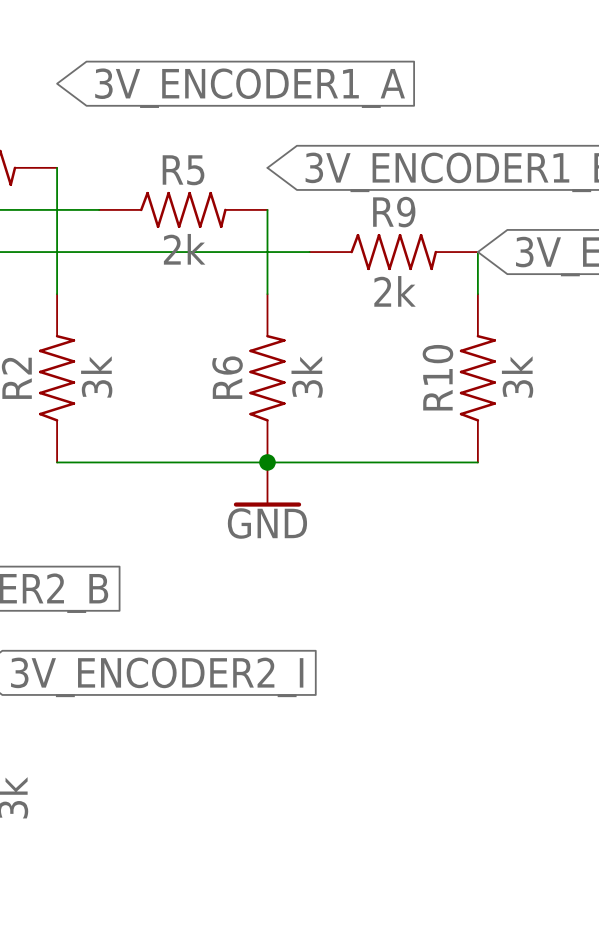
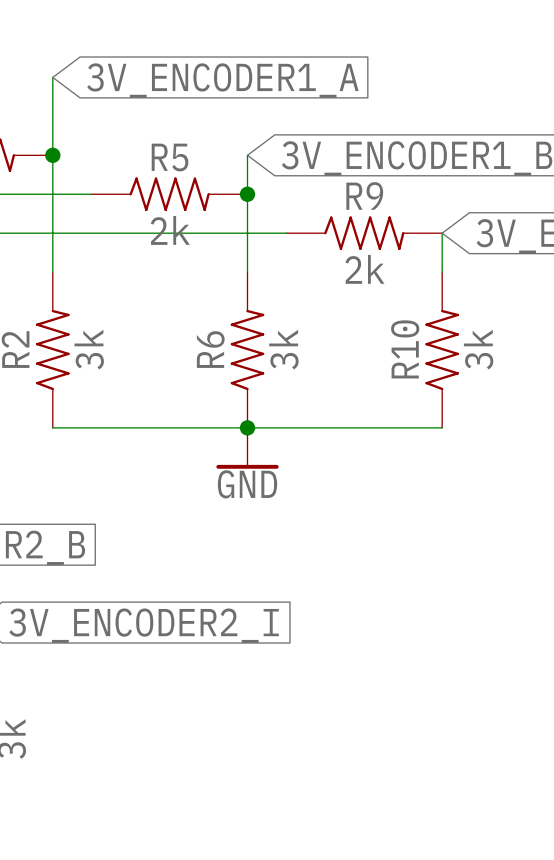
wire: none -> (52, 77) (52, 155)
junction: none -> (52, 155)
wire: none -> (247, 155) (247, 194)
junction: none -> (247, 194)

